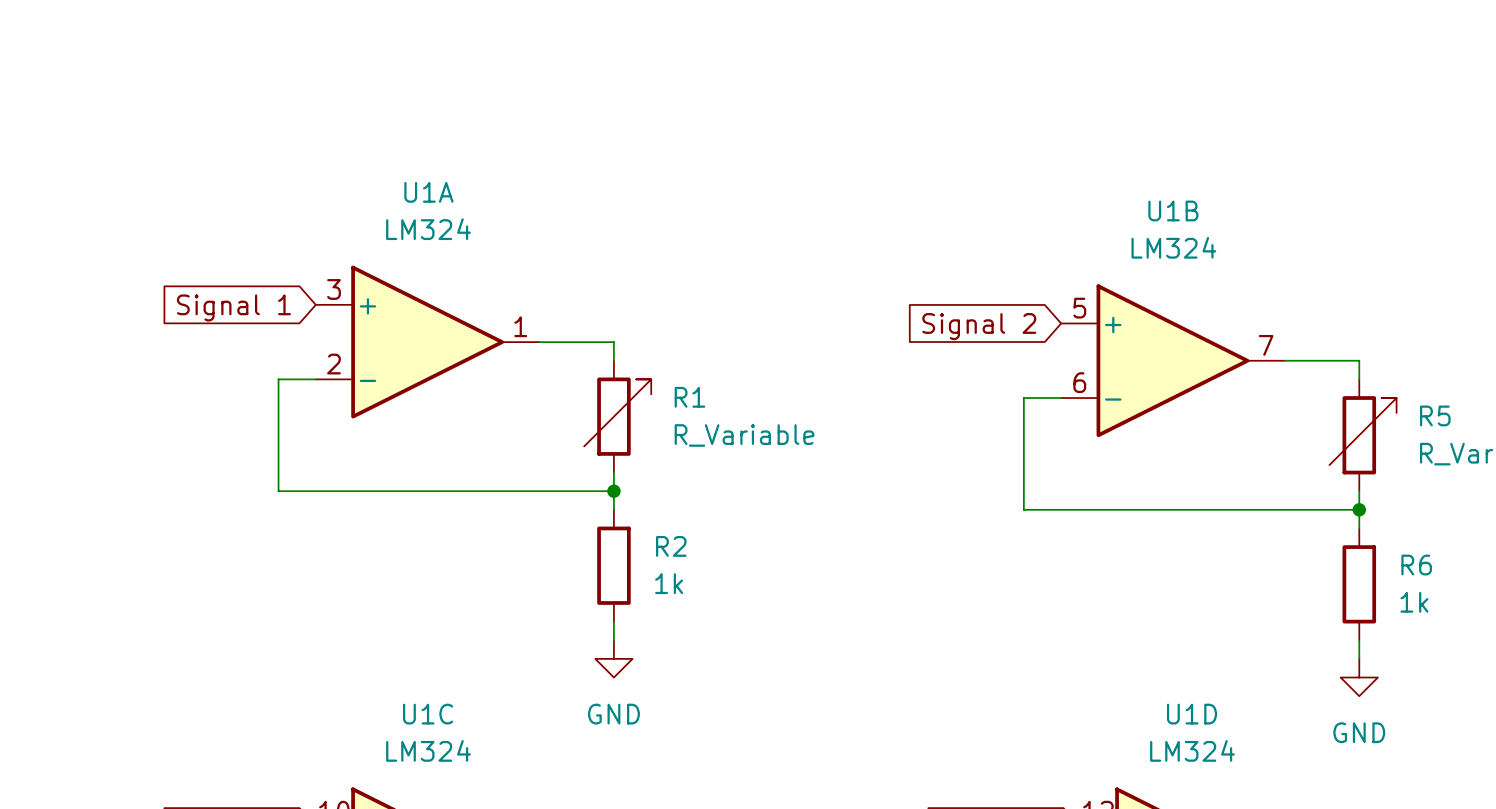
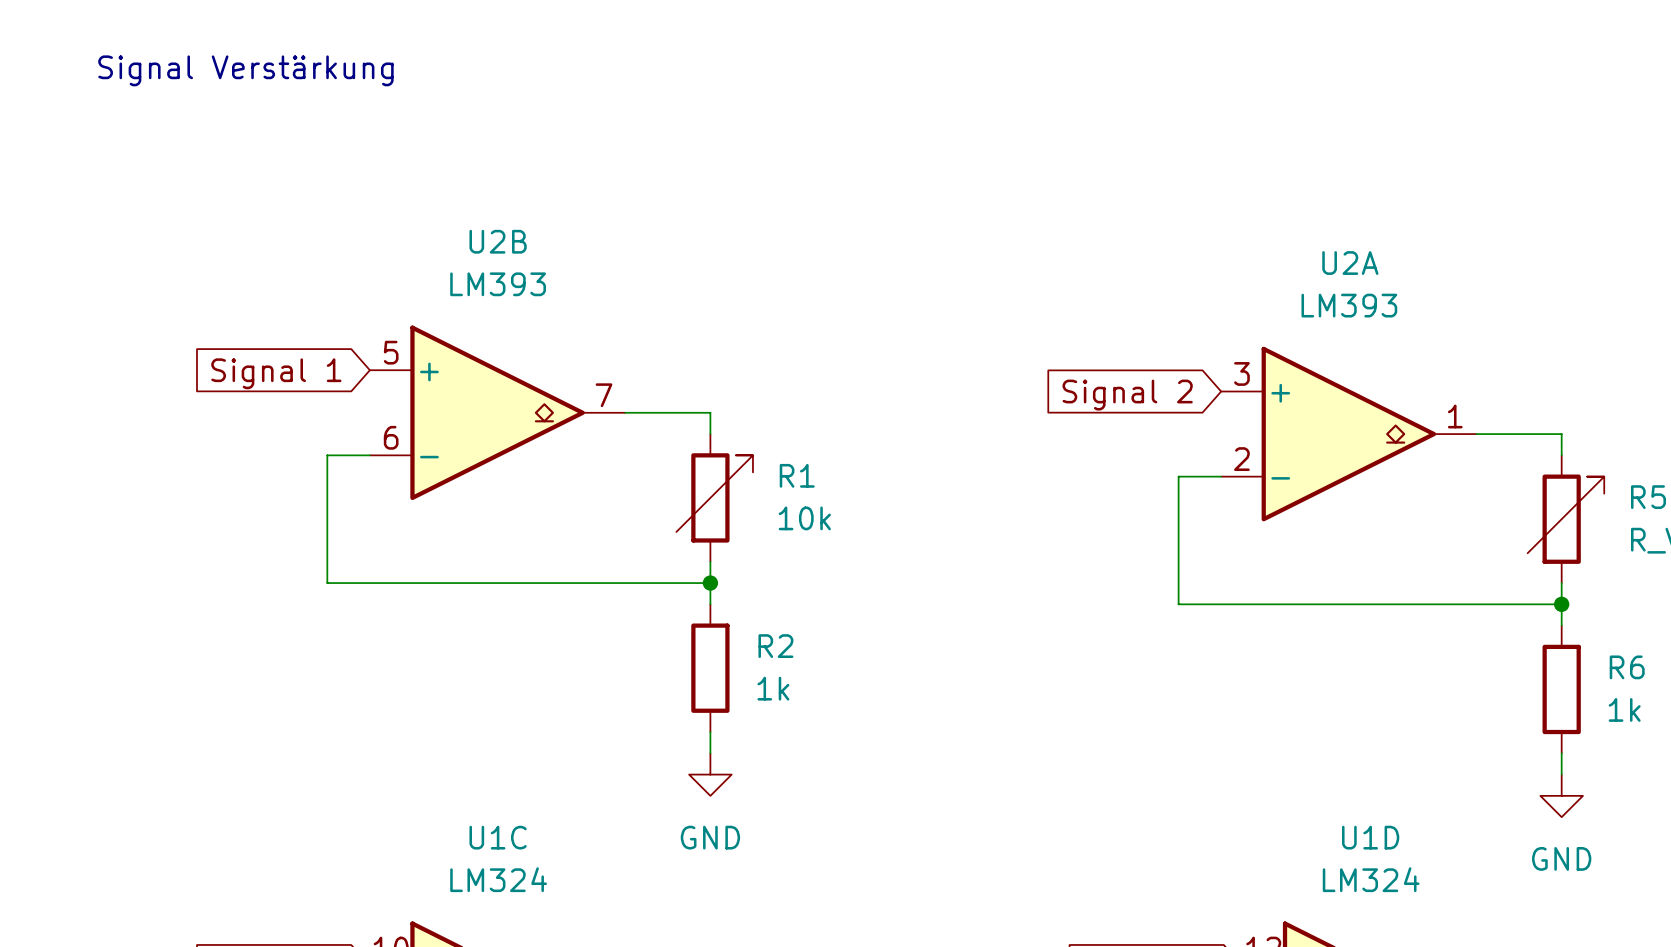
text: none -> Signal Verstärkung (245, 70)
U1A: LM324 (427, 342) -> none
U2B: none -> LM393 (497, 412)
U1B: LM324 (1172, 360) -> none
U2A: none -> LM393 (1348, 434)
R1 value: R_Variable (744, 435) -> 10k (804, 518)

